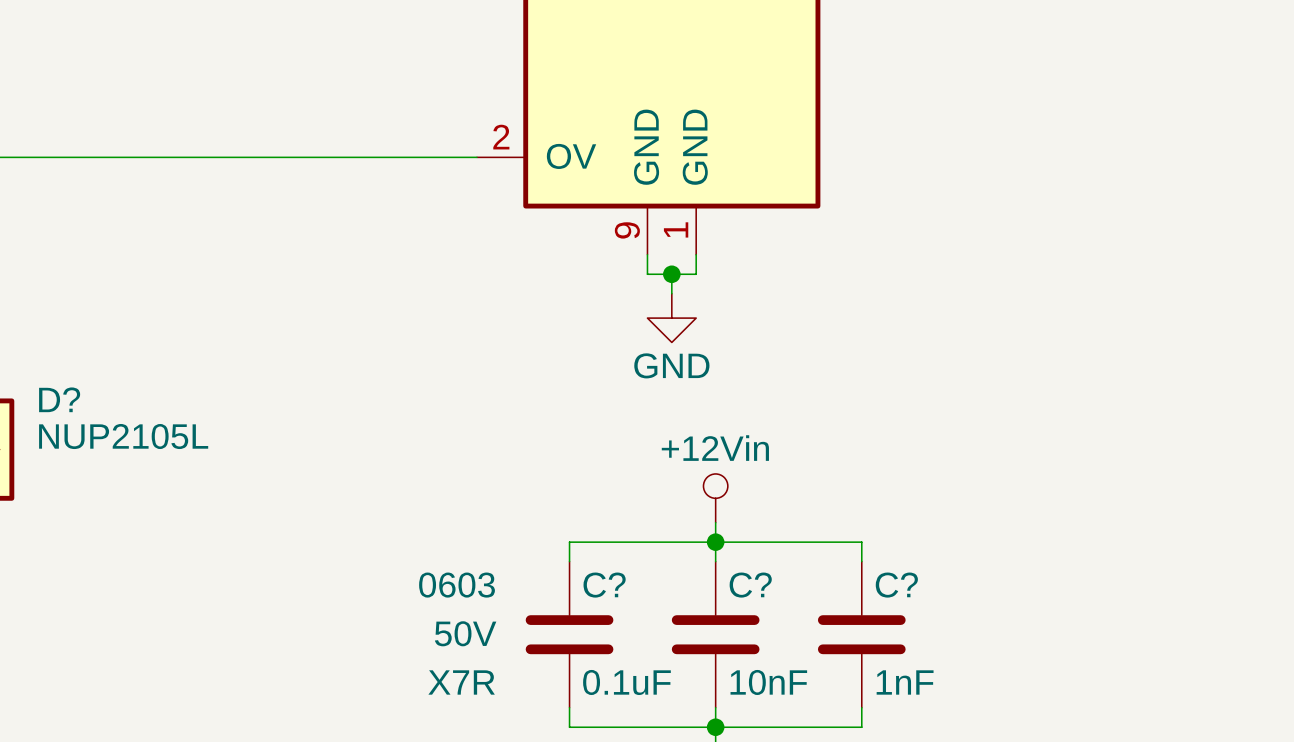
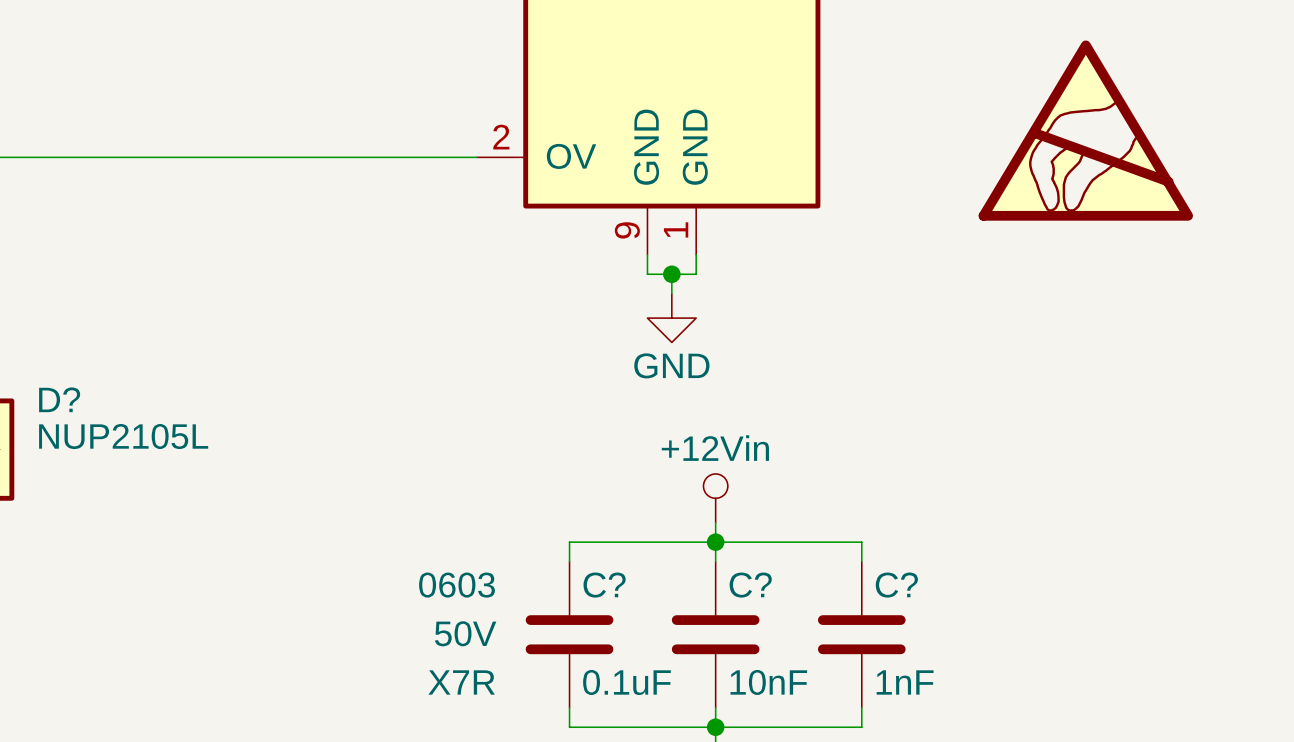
power symbol: none -> (1085, 130)

